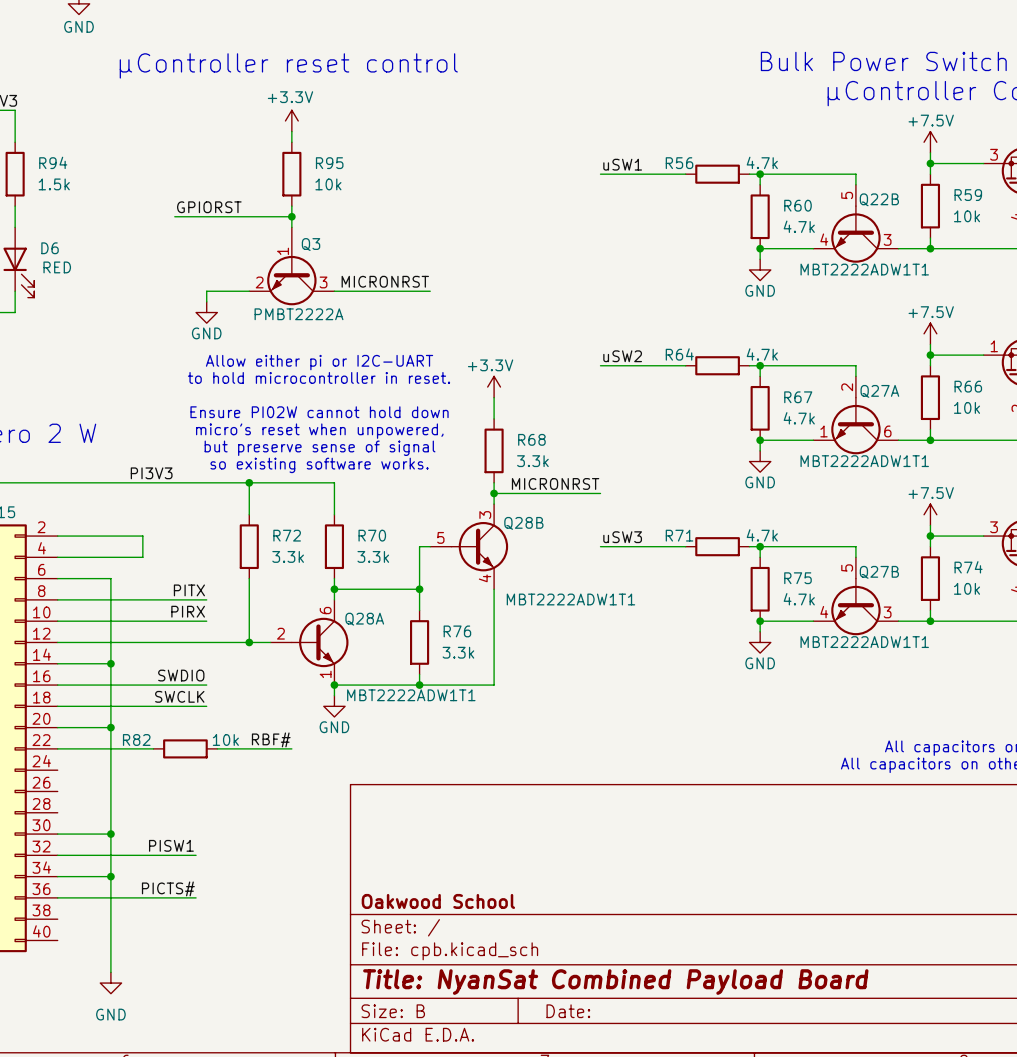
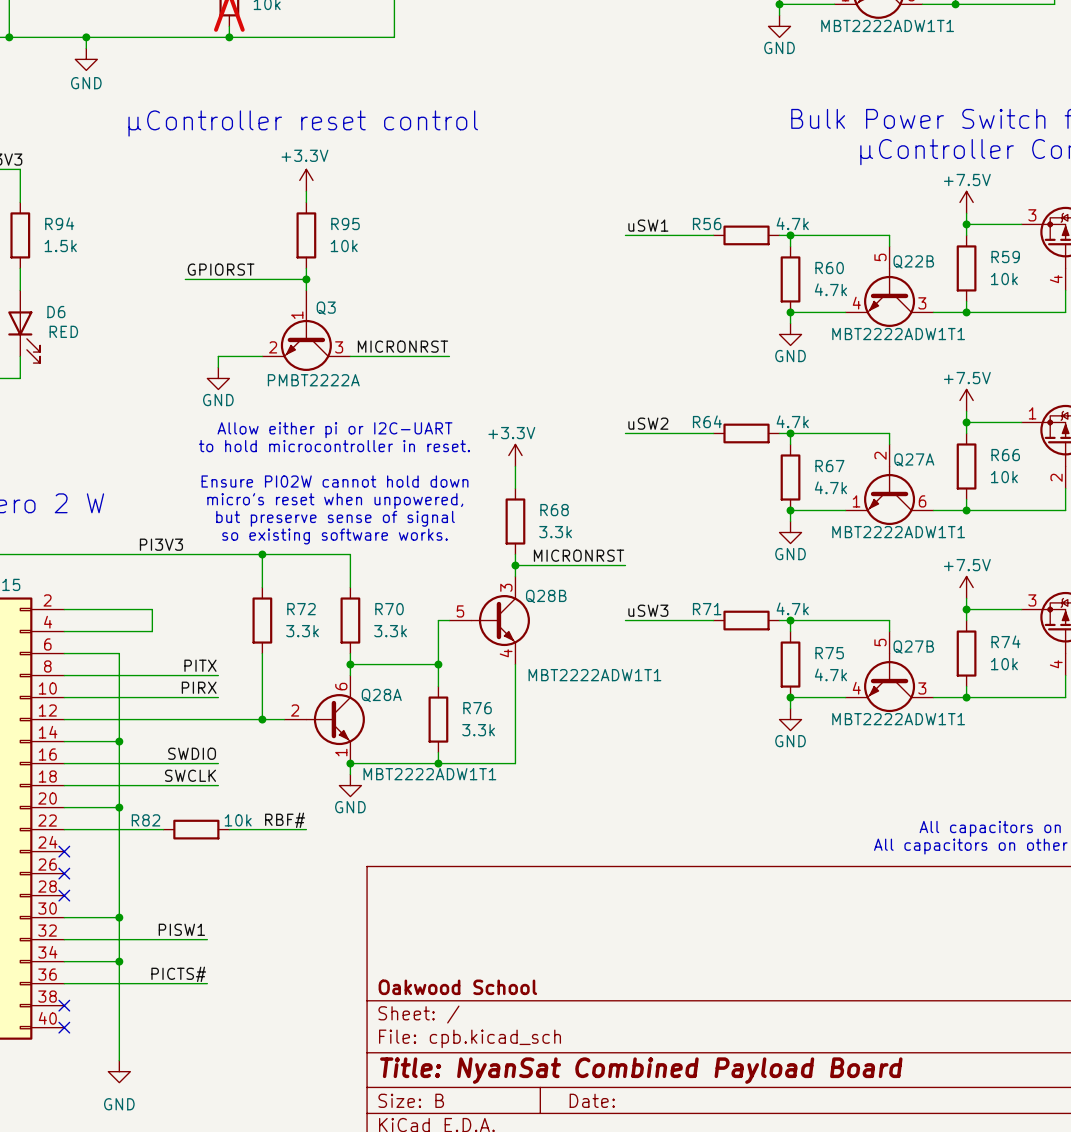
no-connect mark: none -> (64, 851)
no-connect mark: none -> (64, 873)
no-connect mark: none -> (64, 895)
no-connect mark: none -> (64, 1005)
no-connect mark: none -> (64, 1027)

